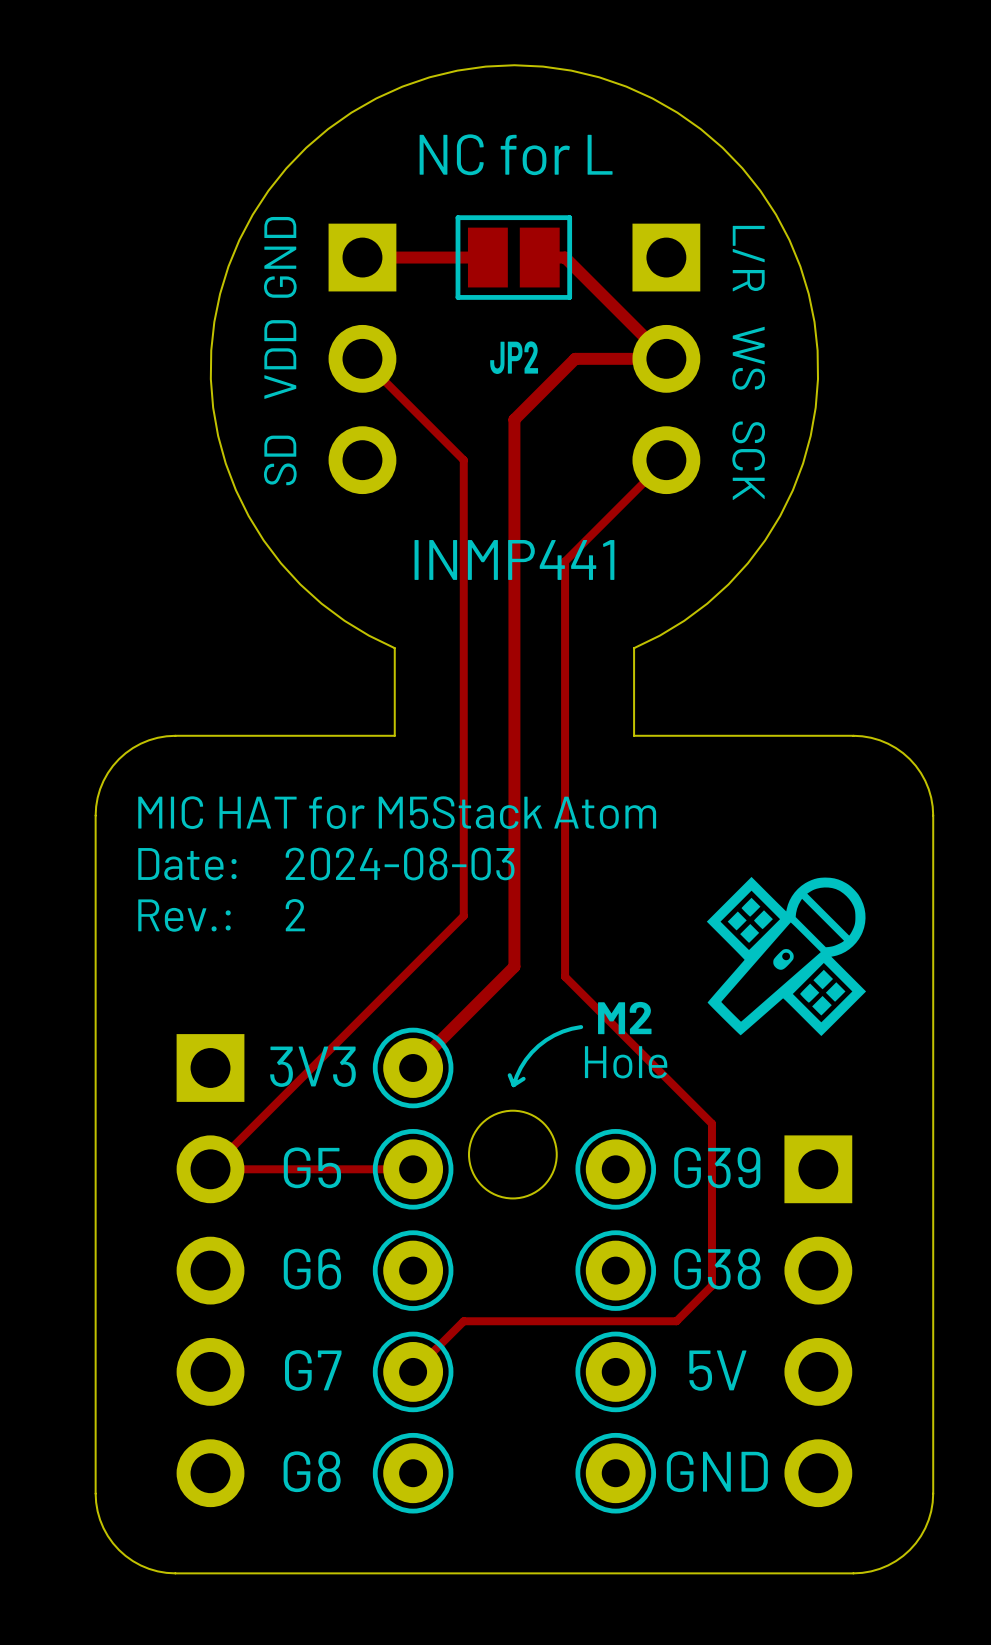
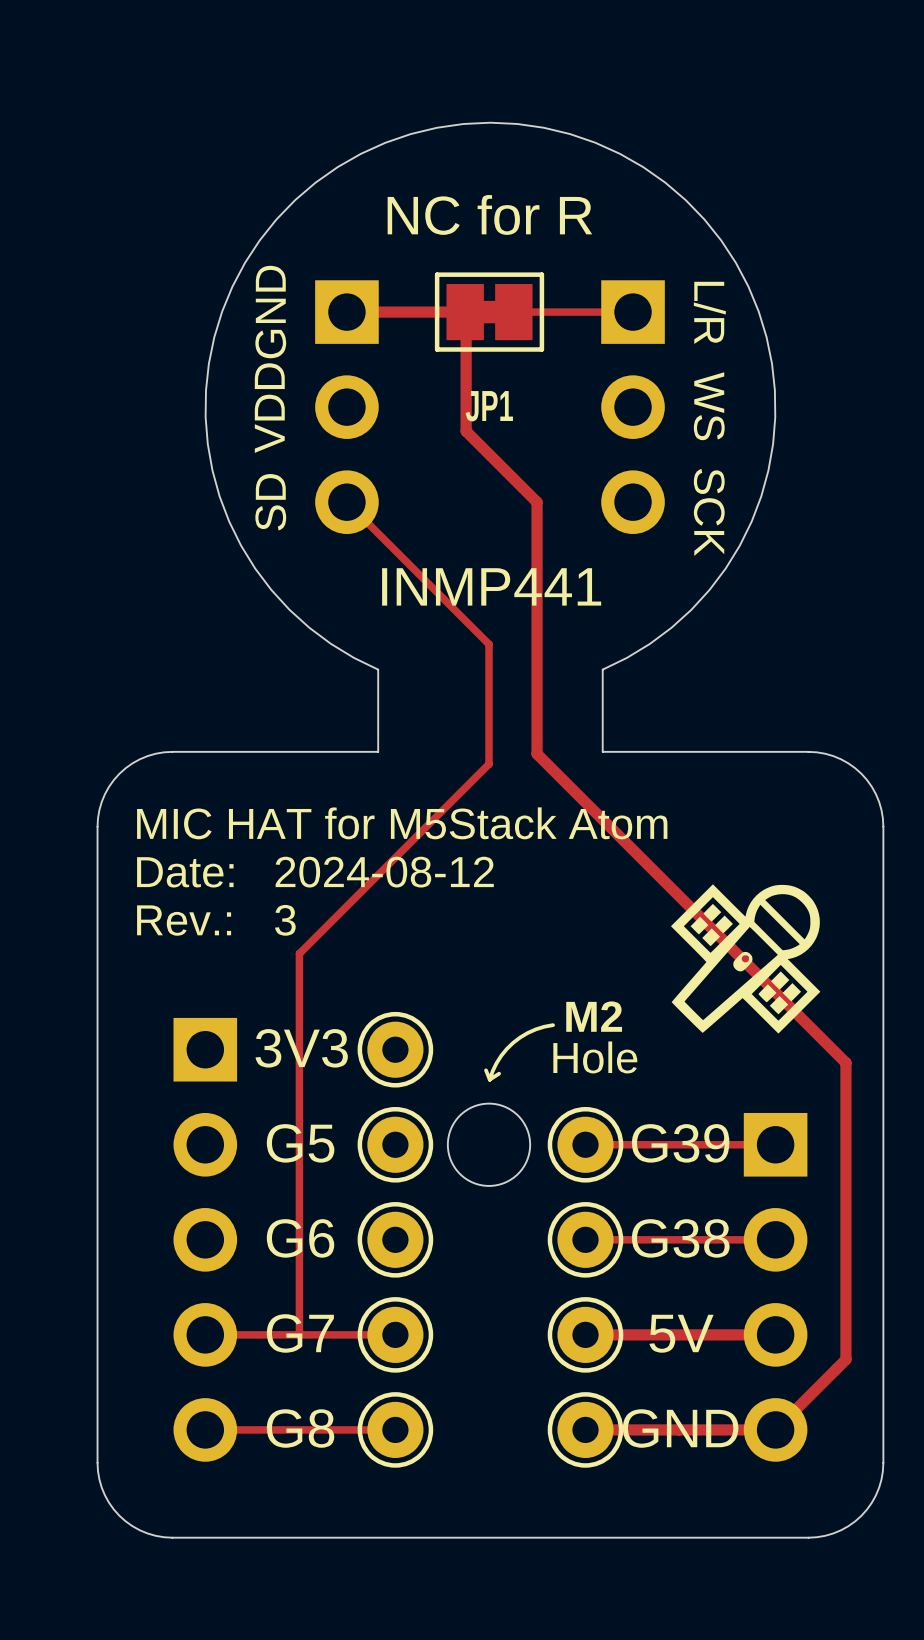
text position: GND (280, 257) -> GND (270, 312)
track: (362, 257) (487, 257) -> (514, 312) (633, 312)
JP2: NC for L (513, 257) -> none
track: (539, 257) (565, 257) (666, 358) (575, 358) (514, 419) (514, 966) (413, 1067) -> none
text position: L/R (748, 258) -> L/R (709, 312)
track: none -> (346, 312) (466, 312) (466, 431) (537, 502) (537, 753) (845, 1062) (845, 1359) (775, 1429) (585, 1429)
JP1: none -> NC for R (489, 312)
track: (362, 358) (463, 460) (463, 916) (210, 1169) (413, 1169) -> none
part position: (362, 358) -> (346, 407)
part position: (666, 358) -> (633, 407)
text position: WS (748, 358) -> WS (709, 406)
text position: VDD (280, 359) -> VDD (269, 408)
text position: SD (280, 460) -> SD (270, 502)
track: (666, 460) (565, 561) (565, 976) (711, 1123) (711, 1285) (676, 1321) (463, 1321) (413, 1371) -> (205, 1334) (395, 1334)
text position: SCK (748, 460) -> SCK (709, 512)
track: none -> (346, 502) (489, 644) (489, 764) (299, 953) (299, 1334)
text position: INMP441 (514, 559) -> INMP441 (491, 586)
board edge: (394, 662) (394, 648) (344, 620) (300, 584) (263, 540) (248, 516) (225, 463) (218, 435) (210, 379) (214, 322) (228, 266) (252, 214) (286, 168) (328, 129) (376, 98) (429, 77) (457, 70) (514, 65) (571, 70) (626, 86) (677, 112) (722, 147) (760, 190) (789, 240) (808, 293) (814, 322) (818, 379) (815, 407) (803, 463) (780, 516) (747, 563) (728, 584) (684, 620) (634, 648) (634, 662) -> (378, 669) (331, 643) (289, 609) (255, 568) (241, 545) (229, 521) (212, 470) (205, 417) (208, 363) (222, 311) (244, 262) (276, 219) (315, 182) (360, 153) (385, 142) (436, 127) (490, 122) (543, 127) (595, 142) (619, 153) (665, 182) (704, 219) (735, 262) (758, 311) (772, 363) (775, 417) (768, 470) (751, 521) (739, 545) (725, 568) (691, 609) (649, 643) (602, 669)
board edge: (394, 735) (175, 735) (149, 740) (125, 753) (107, 773) (97, 797) (95, 830) -> (378, 738) (378, 751) (172, 751) (147, 756) (125, 768) (113, 780) (101, 801) (97, 826)
board edge: (634, 735) (853, 735) (879, 740) (903, 753) (920, 773) (931, 797) (933, 830) -> (602, 738) (602, 751) (808, 751) (833, 756) (855, 768) (867, 780) (879, 801) (883, 826)
text position: MIC HAT for M5Stack Atom (397, 812) -> MIC HAT for M5Stack Atom (402, 823)
text: 2024-08-03 (400, 863) -> 2024-08-12 (384, 872)
text position: Date: (187, 864) -> Date: (185, 872)
text position: Rev.: (184, 915) -> Rev.: (184, 920)
text: 2 (295, 915) -> 3 (285, 920)
drawing position: (786, 956) -> (745, 958)
drawing position: (525, 1112) -> (500, 1105)
track: none -> (585, 1144) (775, 1144)
track: none -> (585, 1239) (775, 1239)
track: none -> (585, 1334) (775, 1334)
track: none -> (205, 1429) (395, 1429)
board edge: (95, 1493) (97, 1511) (103, 1528) (119, 1550) (140, 1565) (157, 1571) (175, 1573) (862, 1572) (888, 1565) (903, 1555) (915, 1543) (928, 1519) (933, 1493) -> (97, 1449) (99, 1479) (104, 1495) (113, 1509) (125, 1521) (139, 1530) (155, 1535) (172, 1537) (816, 1537) (841, 1530) (855, 1521) (867, 1509) (875, 1495) (881, 1479) (883, 1449)

